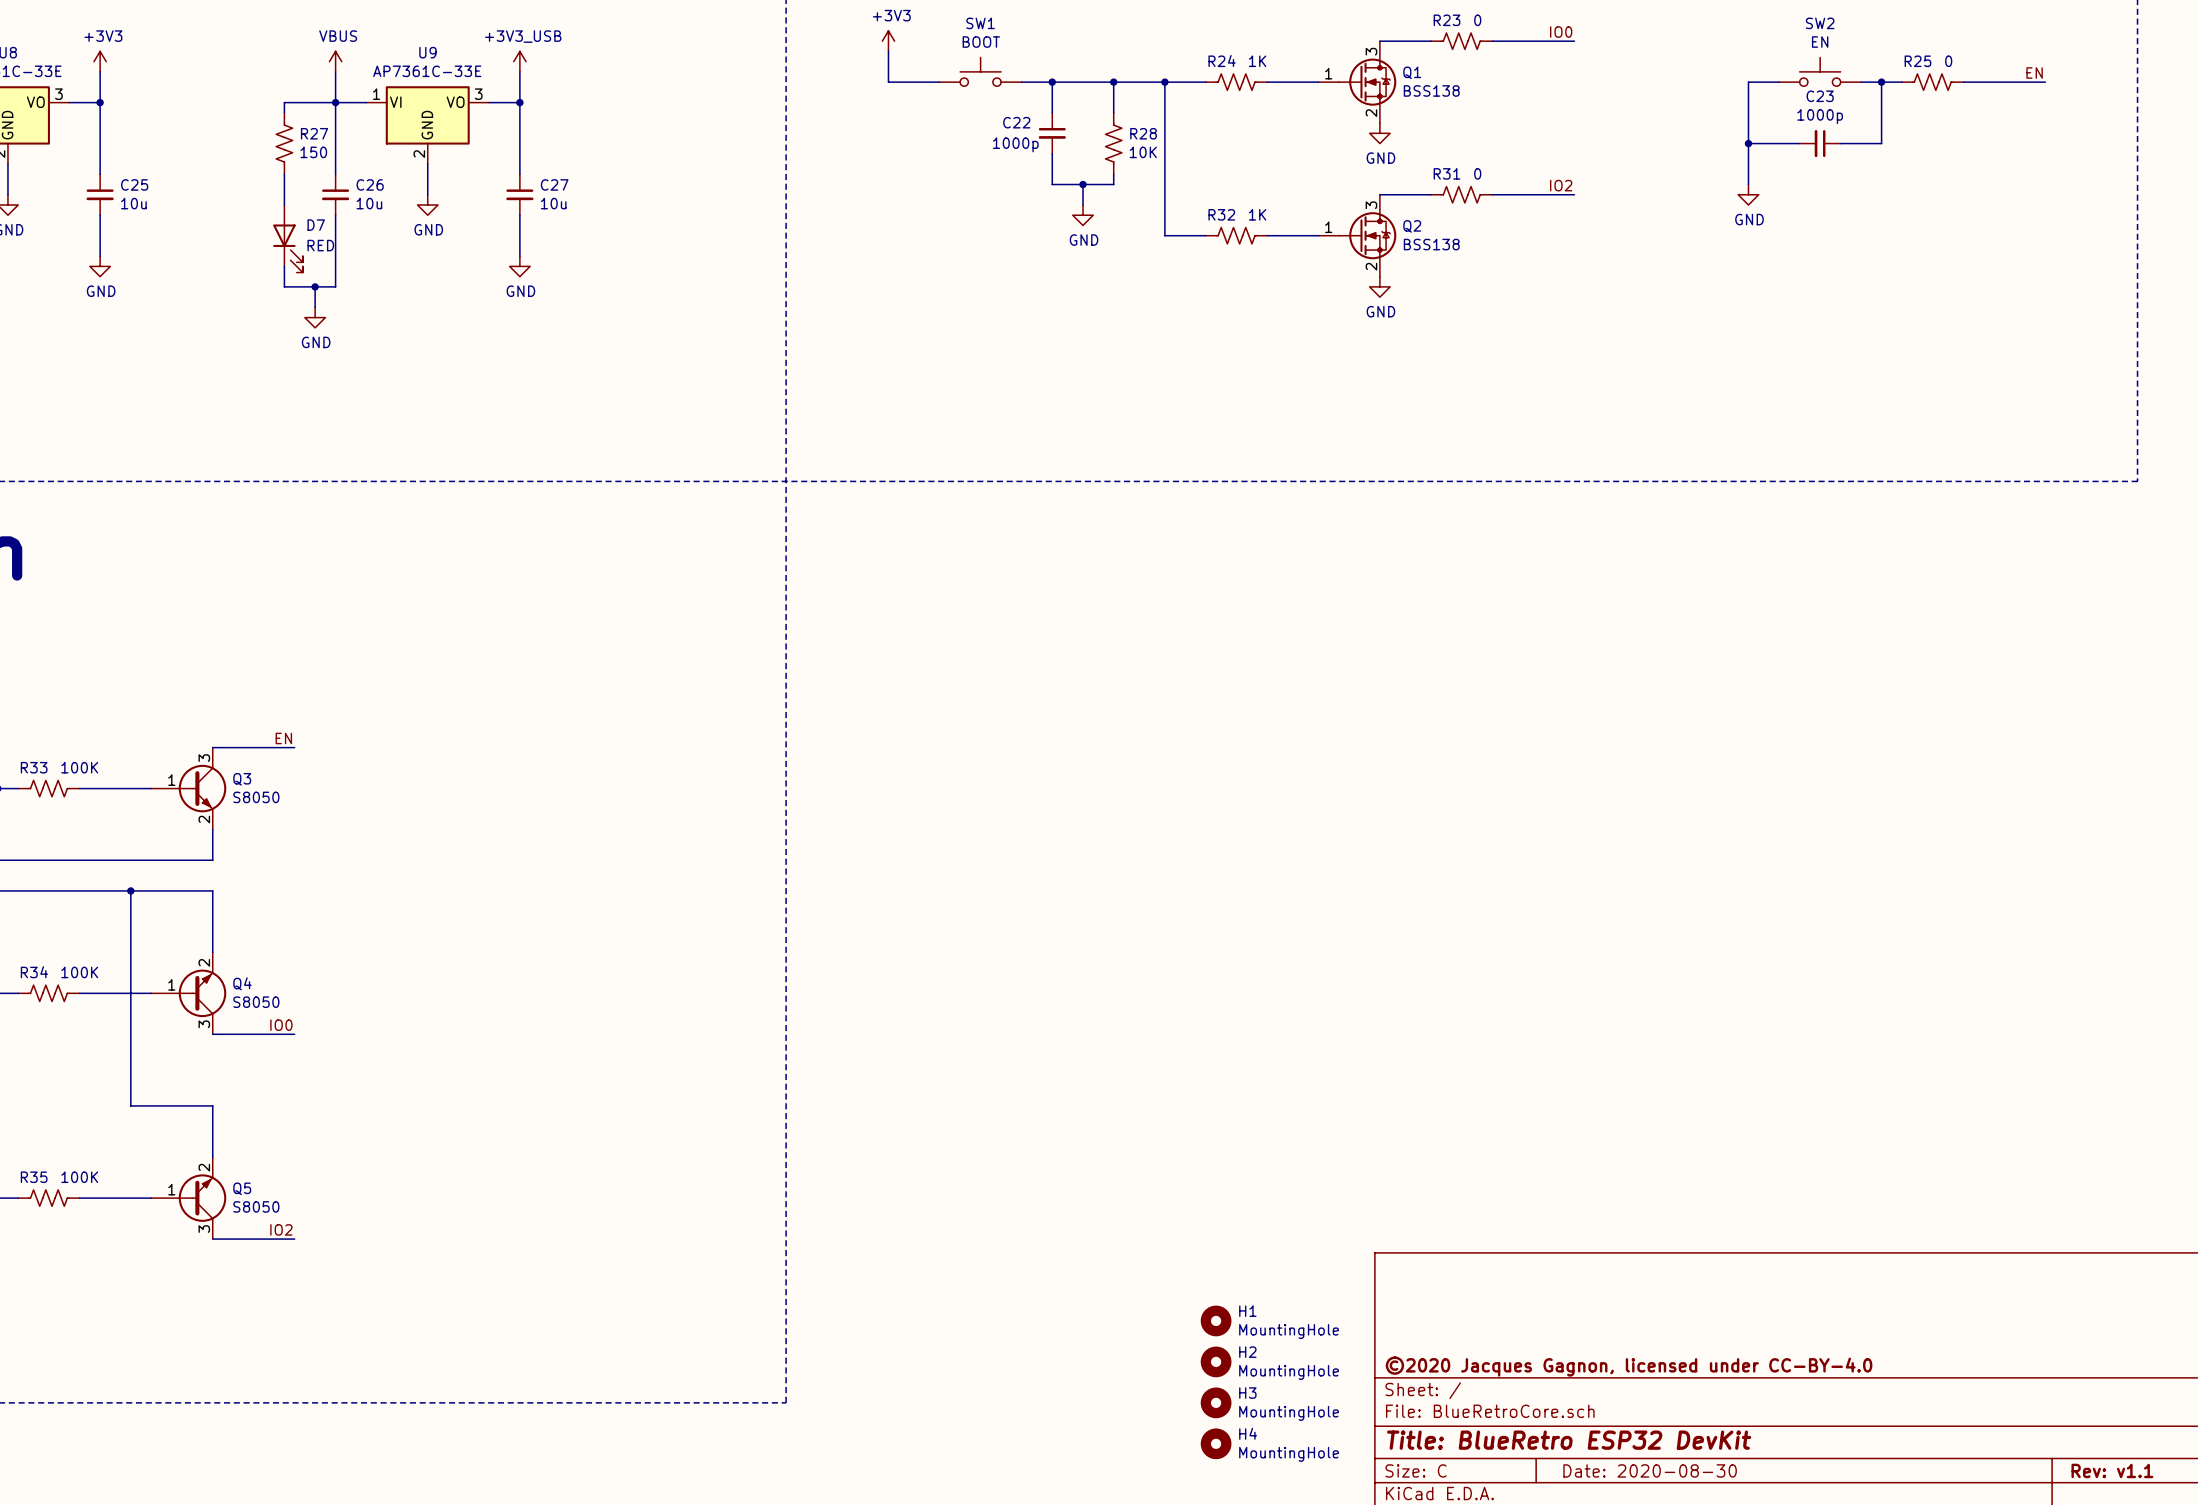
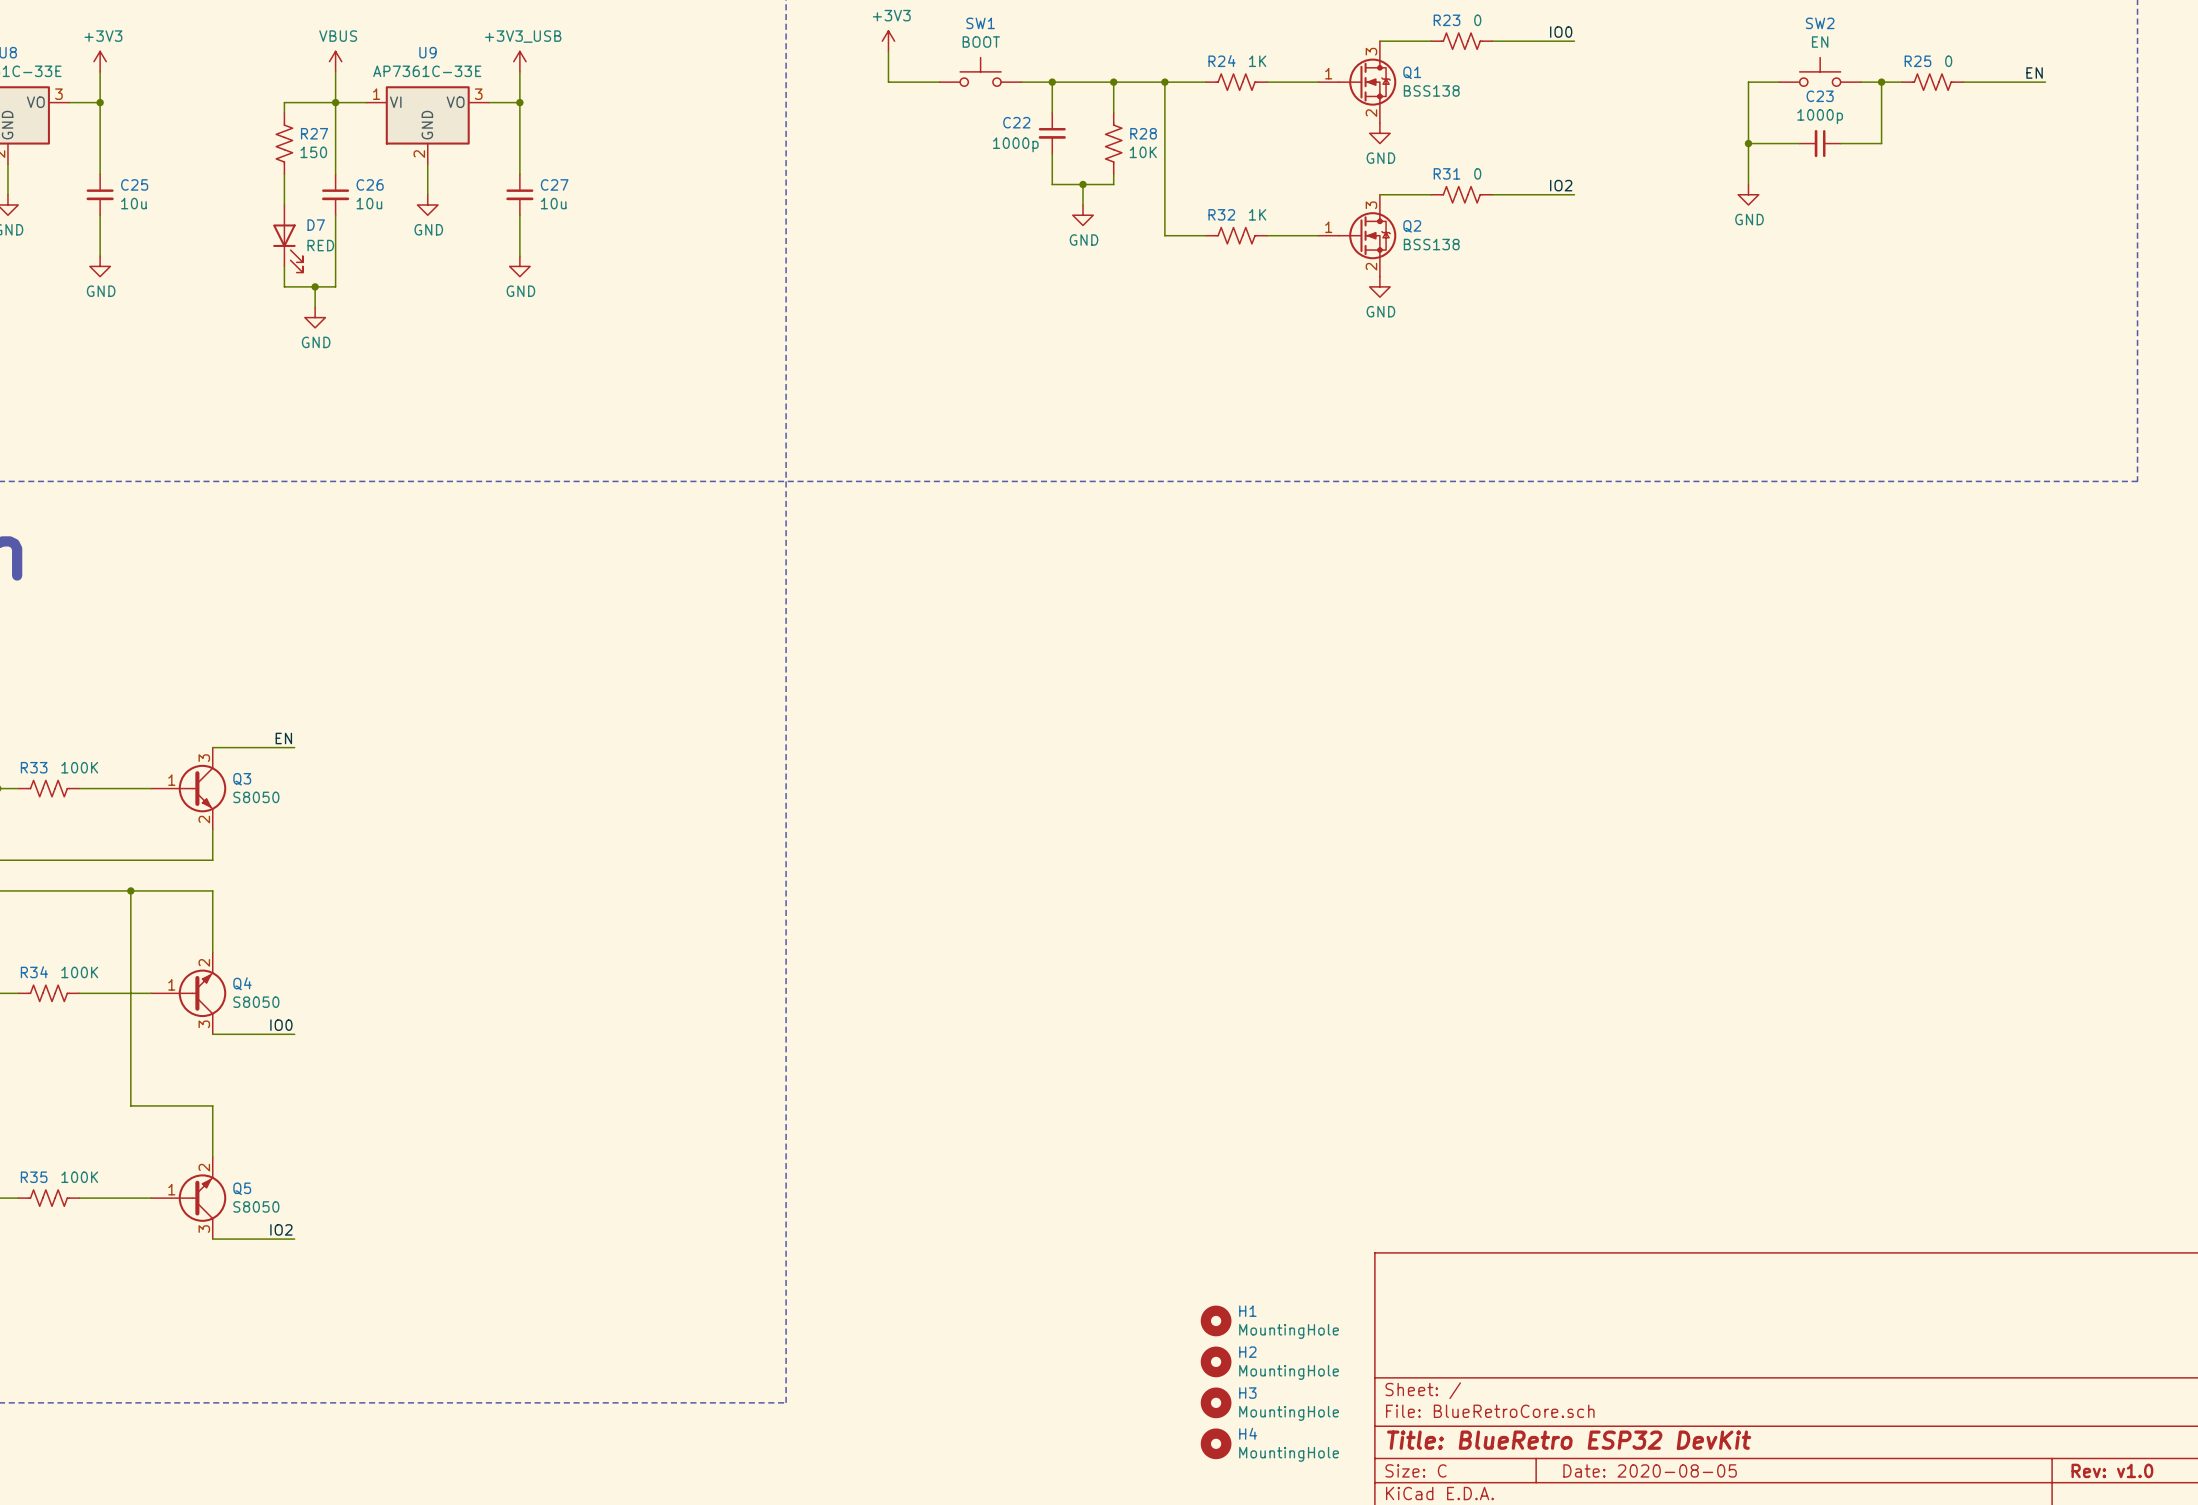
title block: ©2020 Jacques Gagnon, licensed under CC-BY-4.0 (1629, 1366) -> none
title block: Date: 2020-08-30 (1650, 1470) -> Date: 2020-08-05 (1650, 1470)
title block: Rev: v1.1 (2112, 1470) -> Rev: v1.0 (2112, 1470)

